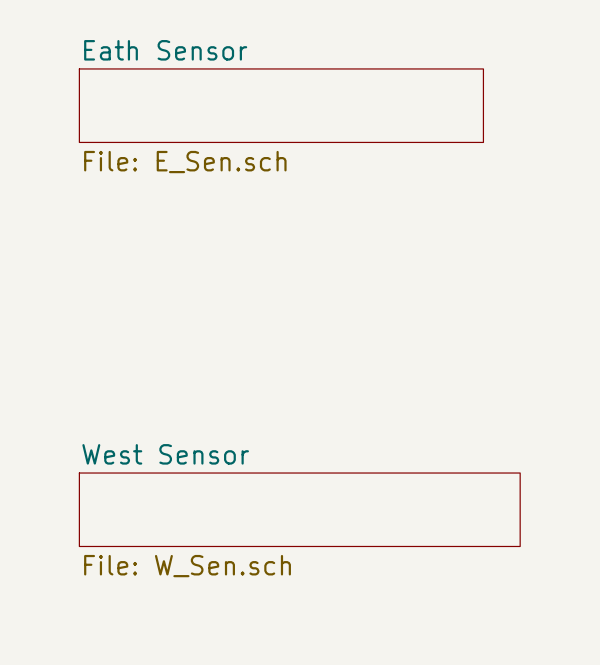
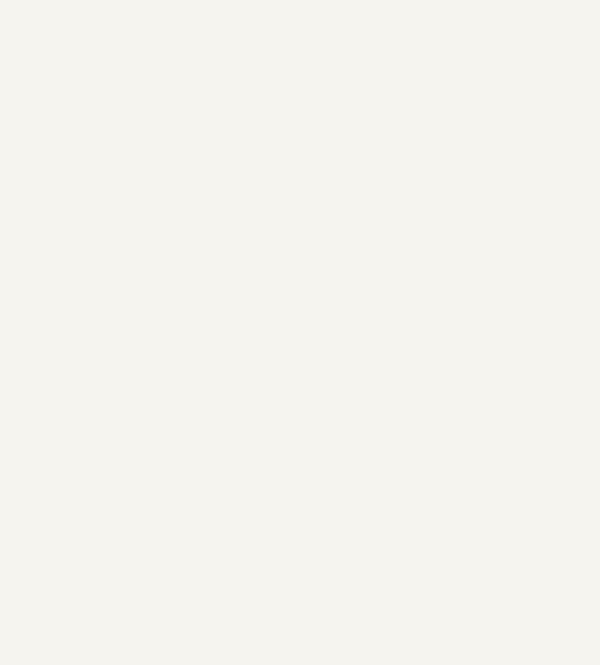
sheet Eath Sensor: File: E_Sen.sch (281, 105) -> none
sheet West Sensor: File: W_Sen.sch (299, 509) -> none

